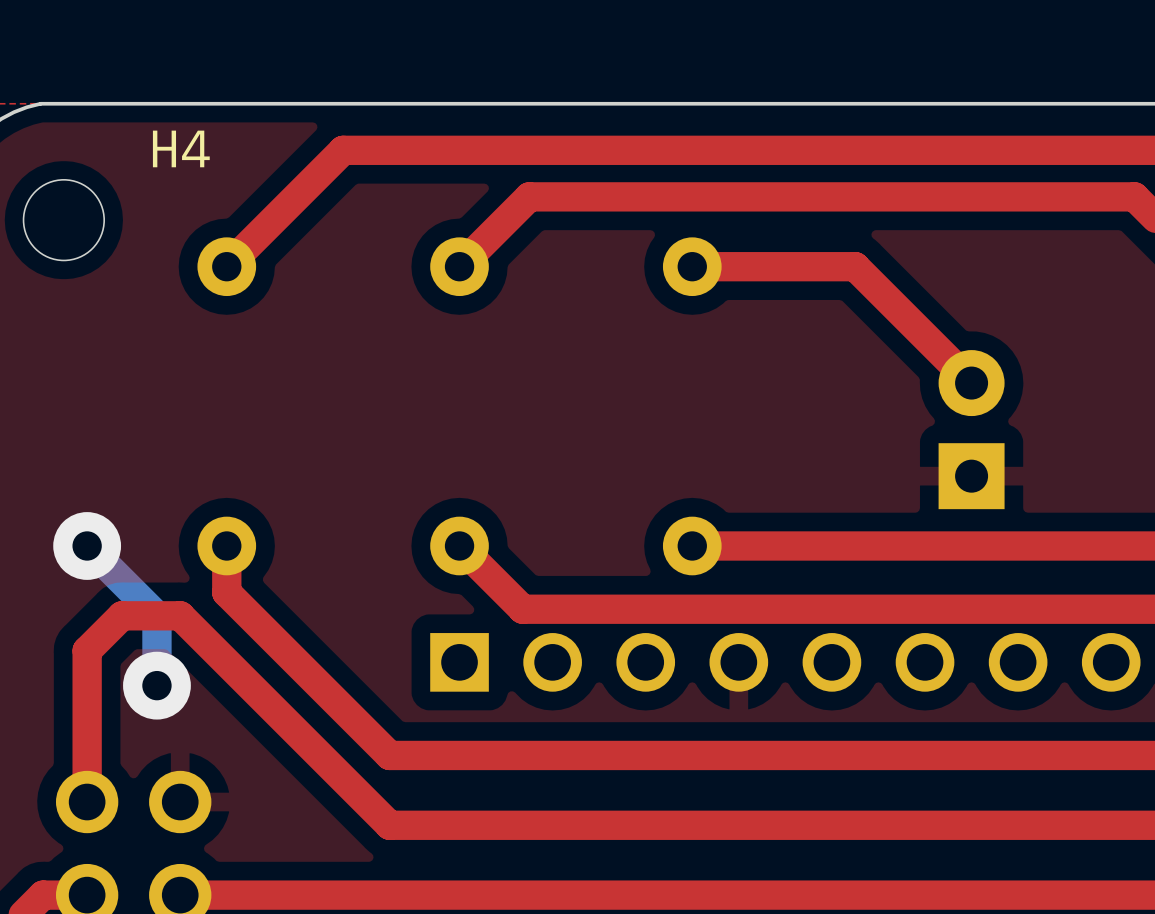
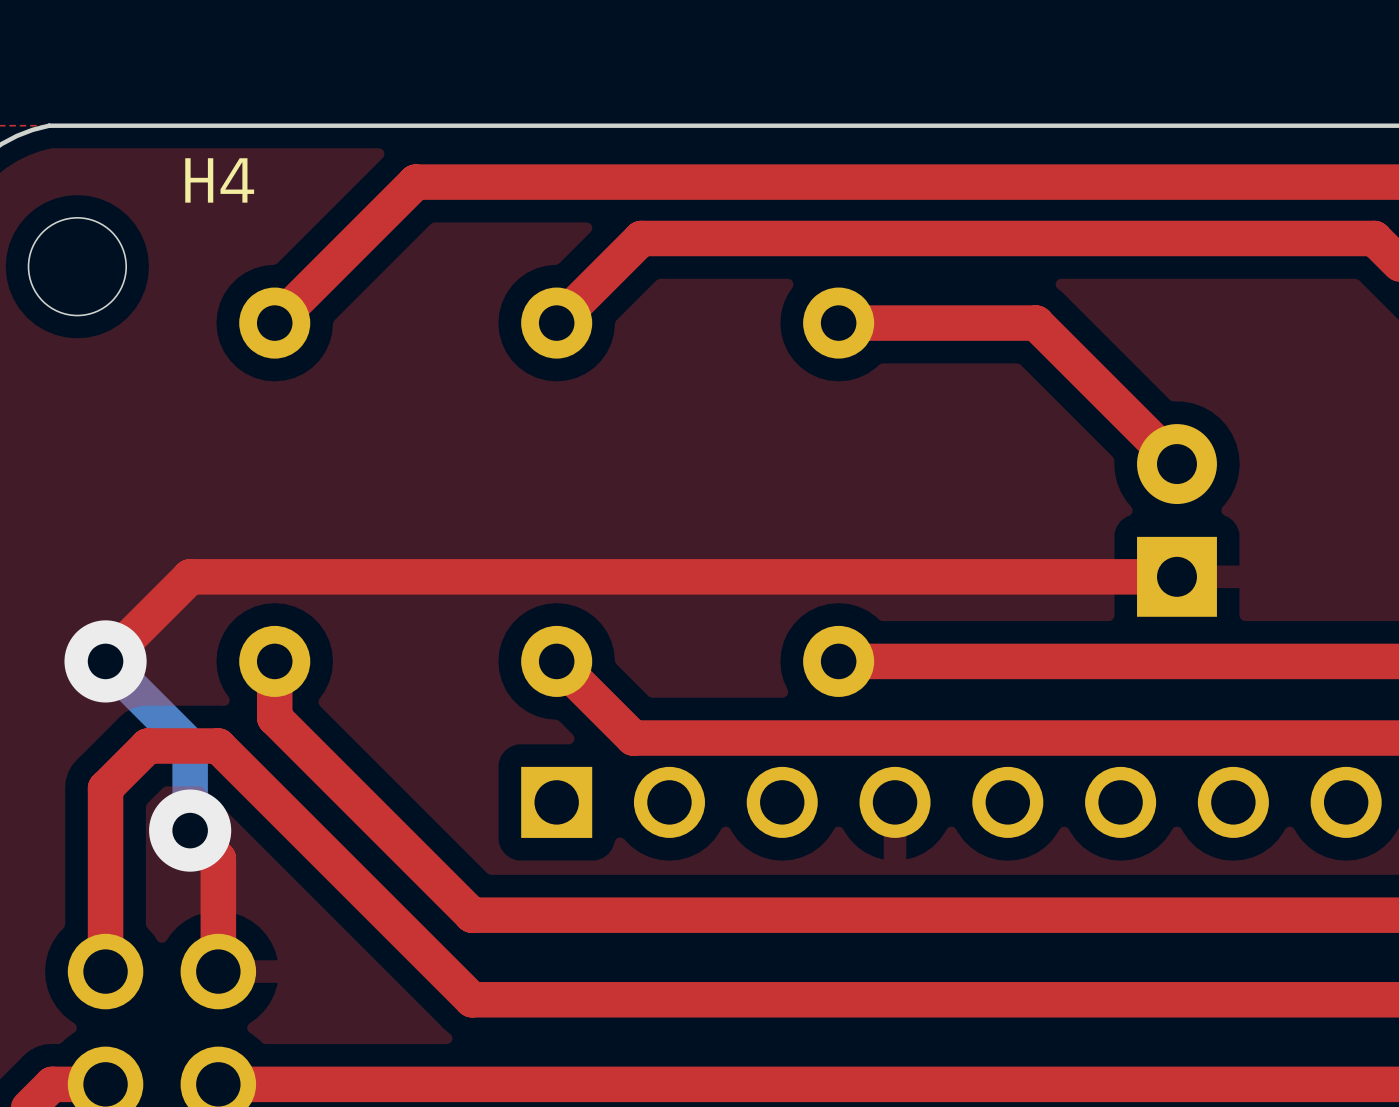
top track: none -> (1176, 576) (190, 576) (105, 661)
top track: none -> (190, 830) (218, 858) (218, 971)

